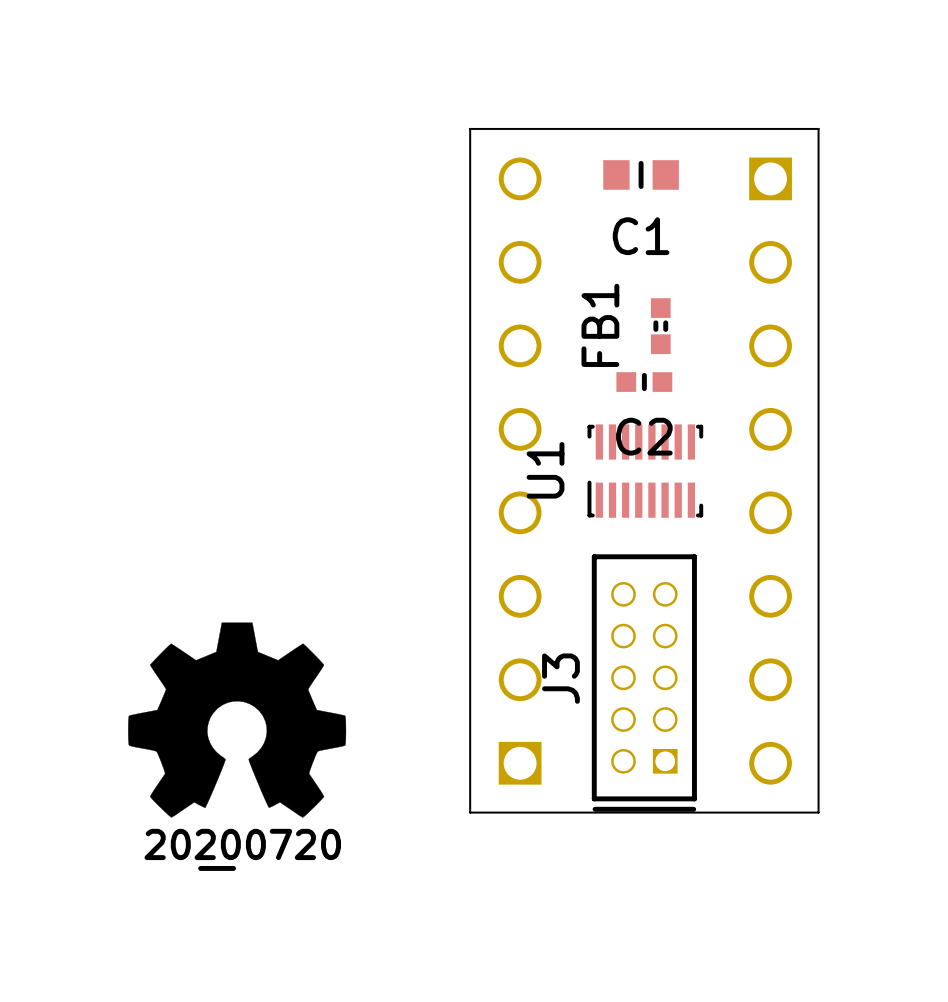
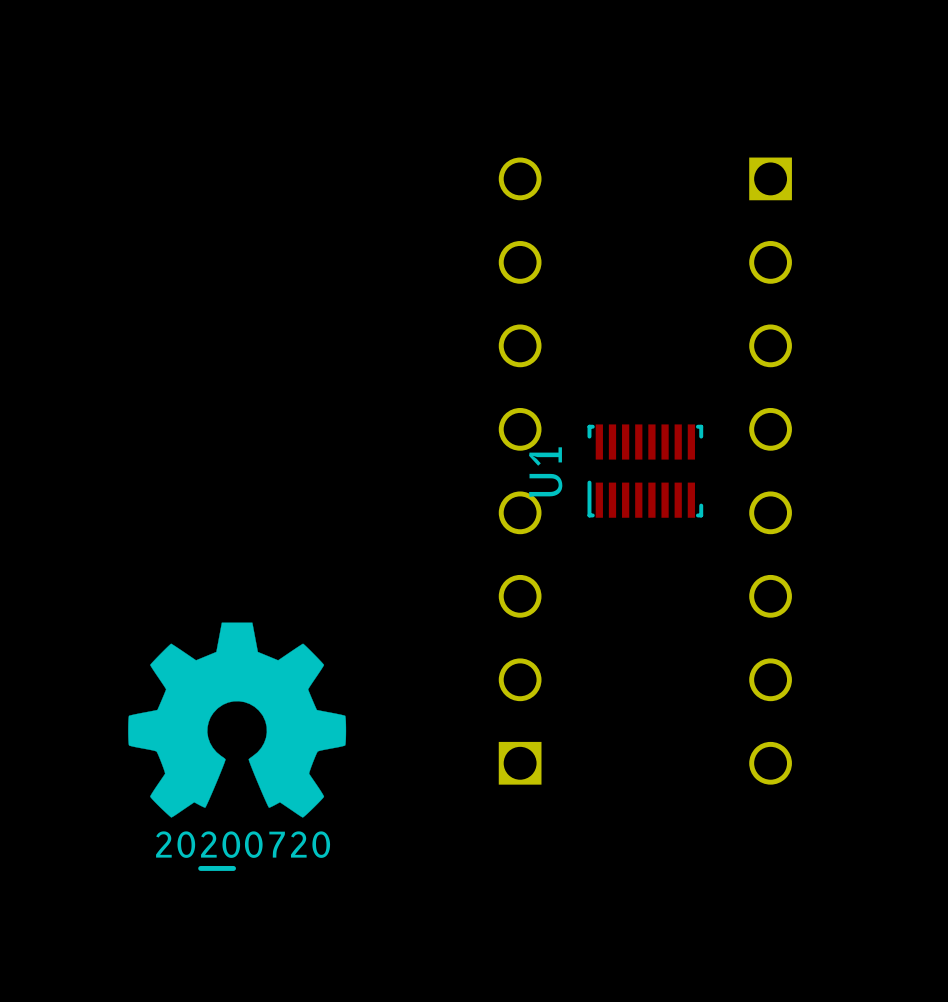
board edge: (470, 128) (818, 128) (818, 812) (470, 812) (470, 128) -> none
C1: (641, 174) -> none
FB1: (660, 326) -> none
C2: (644, 382) -> none
J3: (644, 683) -> none

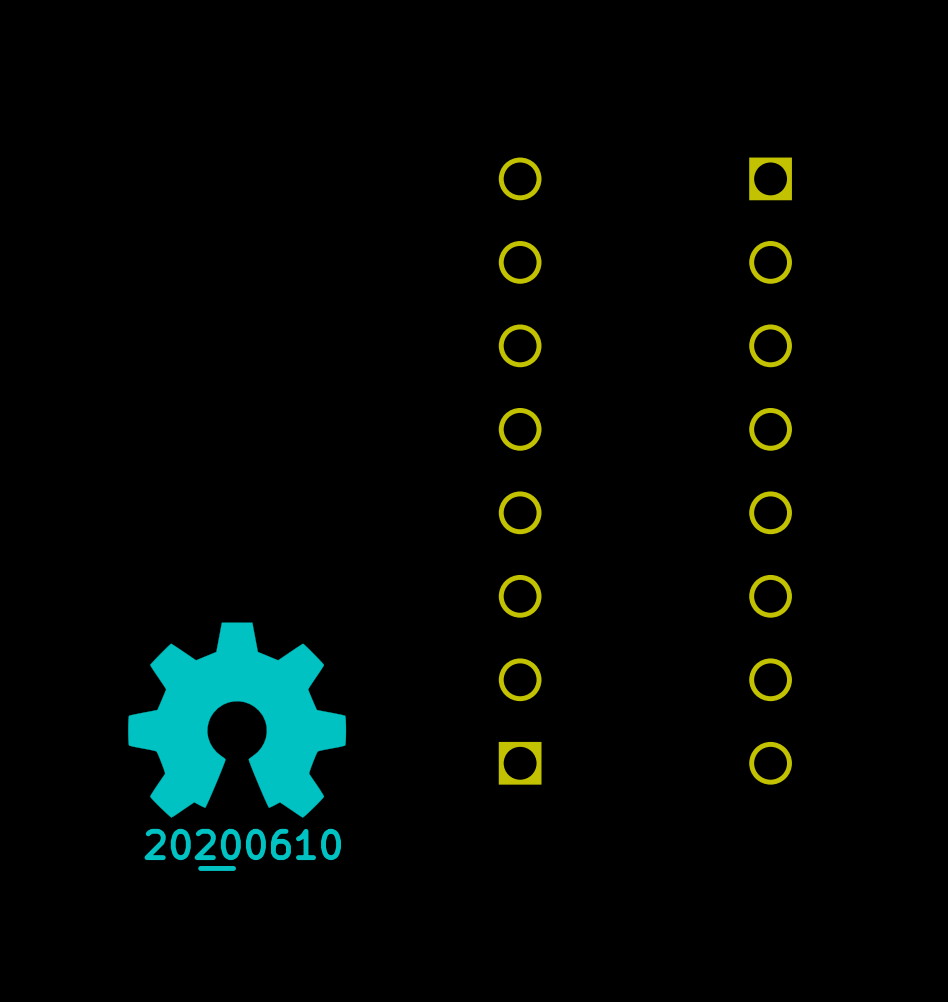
U1: (645, 471) -> none
drawing shape: [156, 831, 331, 871] -> [144, 828, 342, 871]

